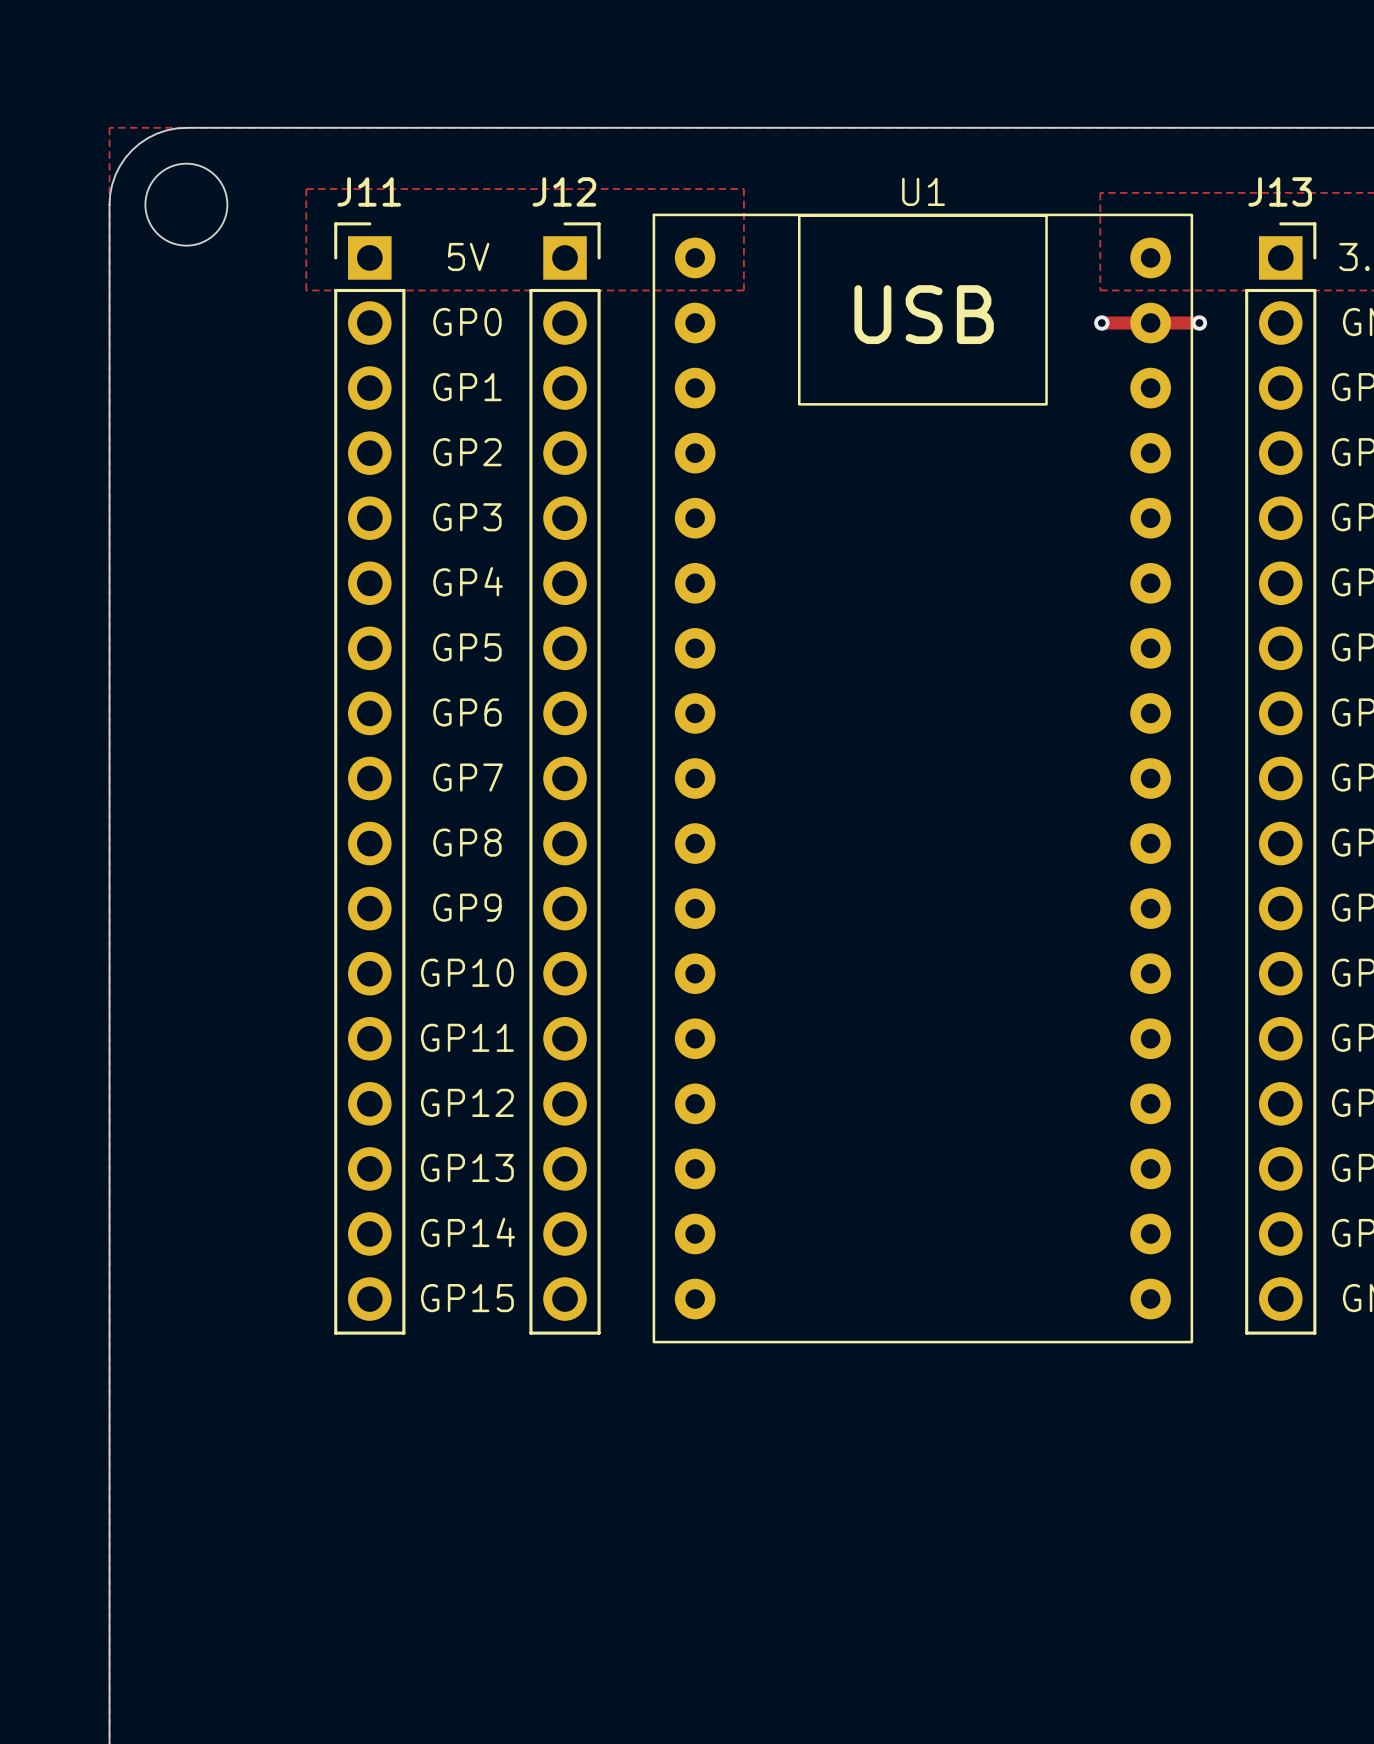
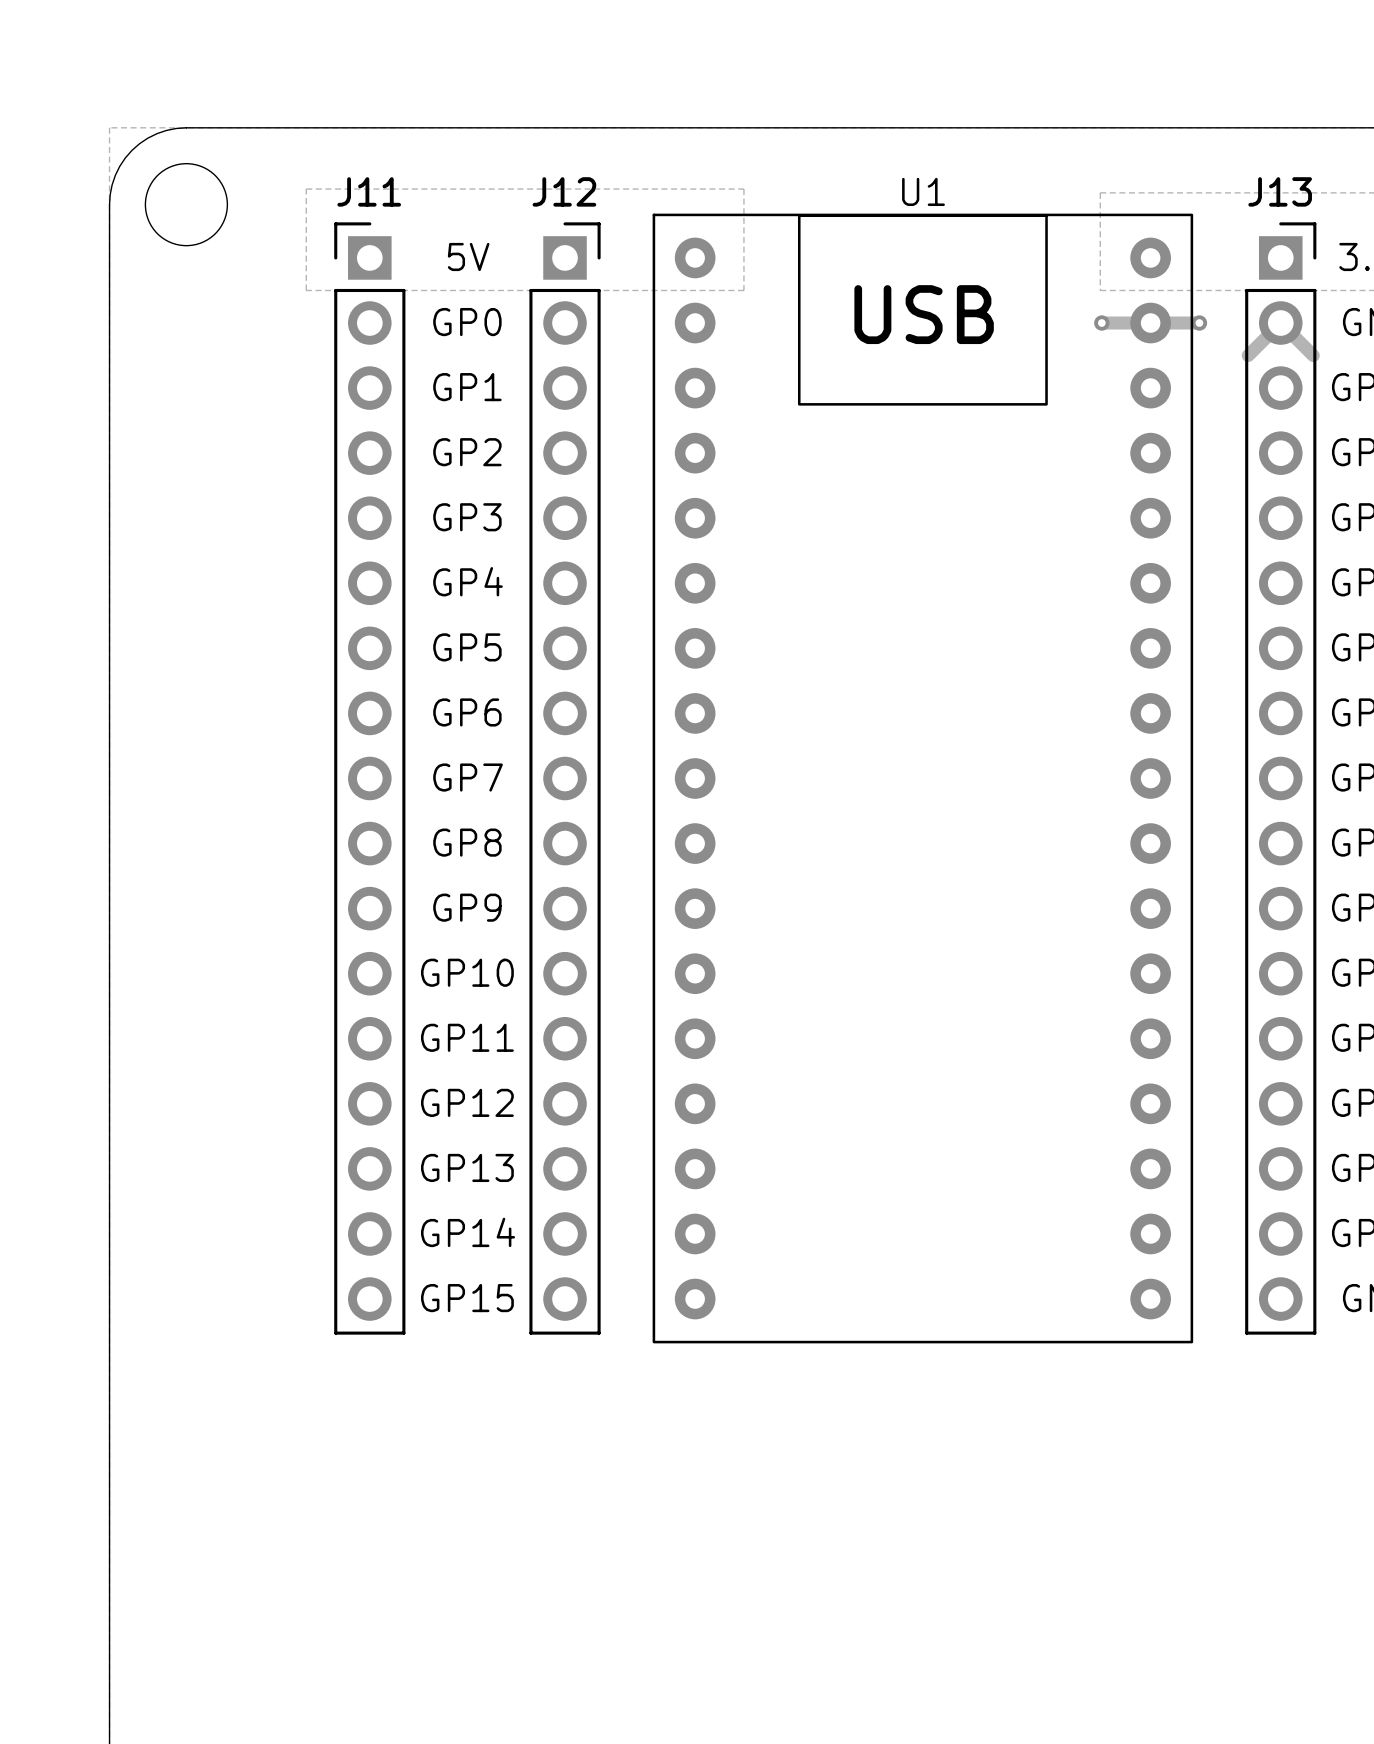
track: none -> (1248, 355) (1280, 323) (1313, 355)

